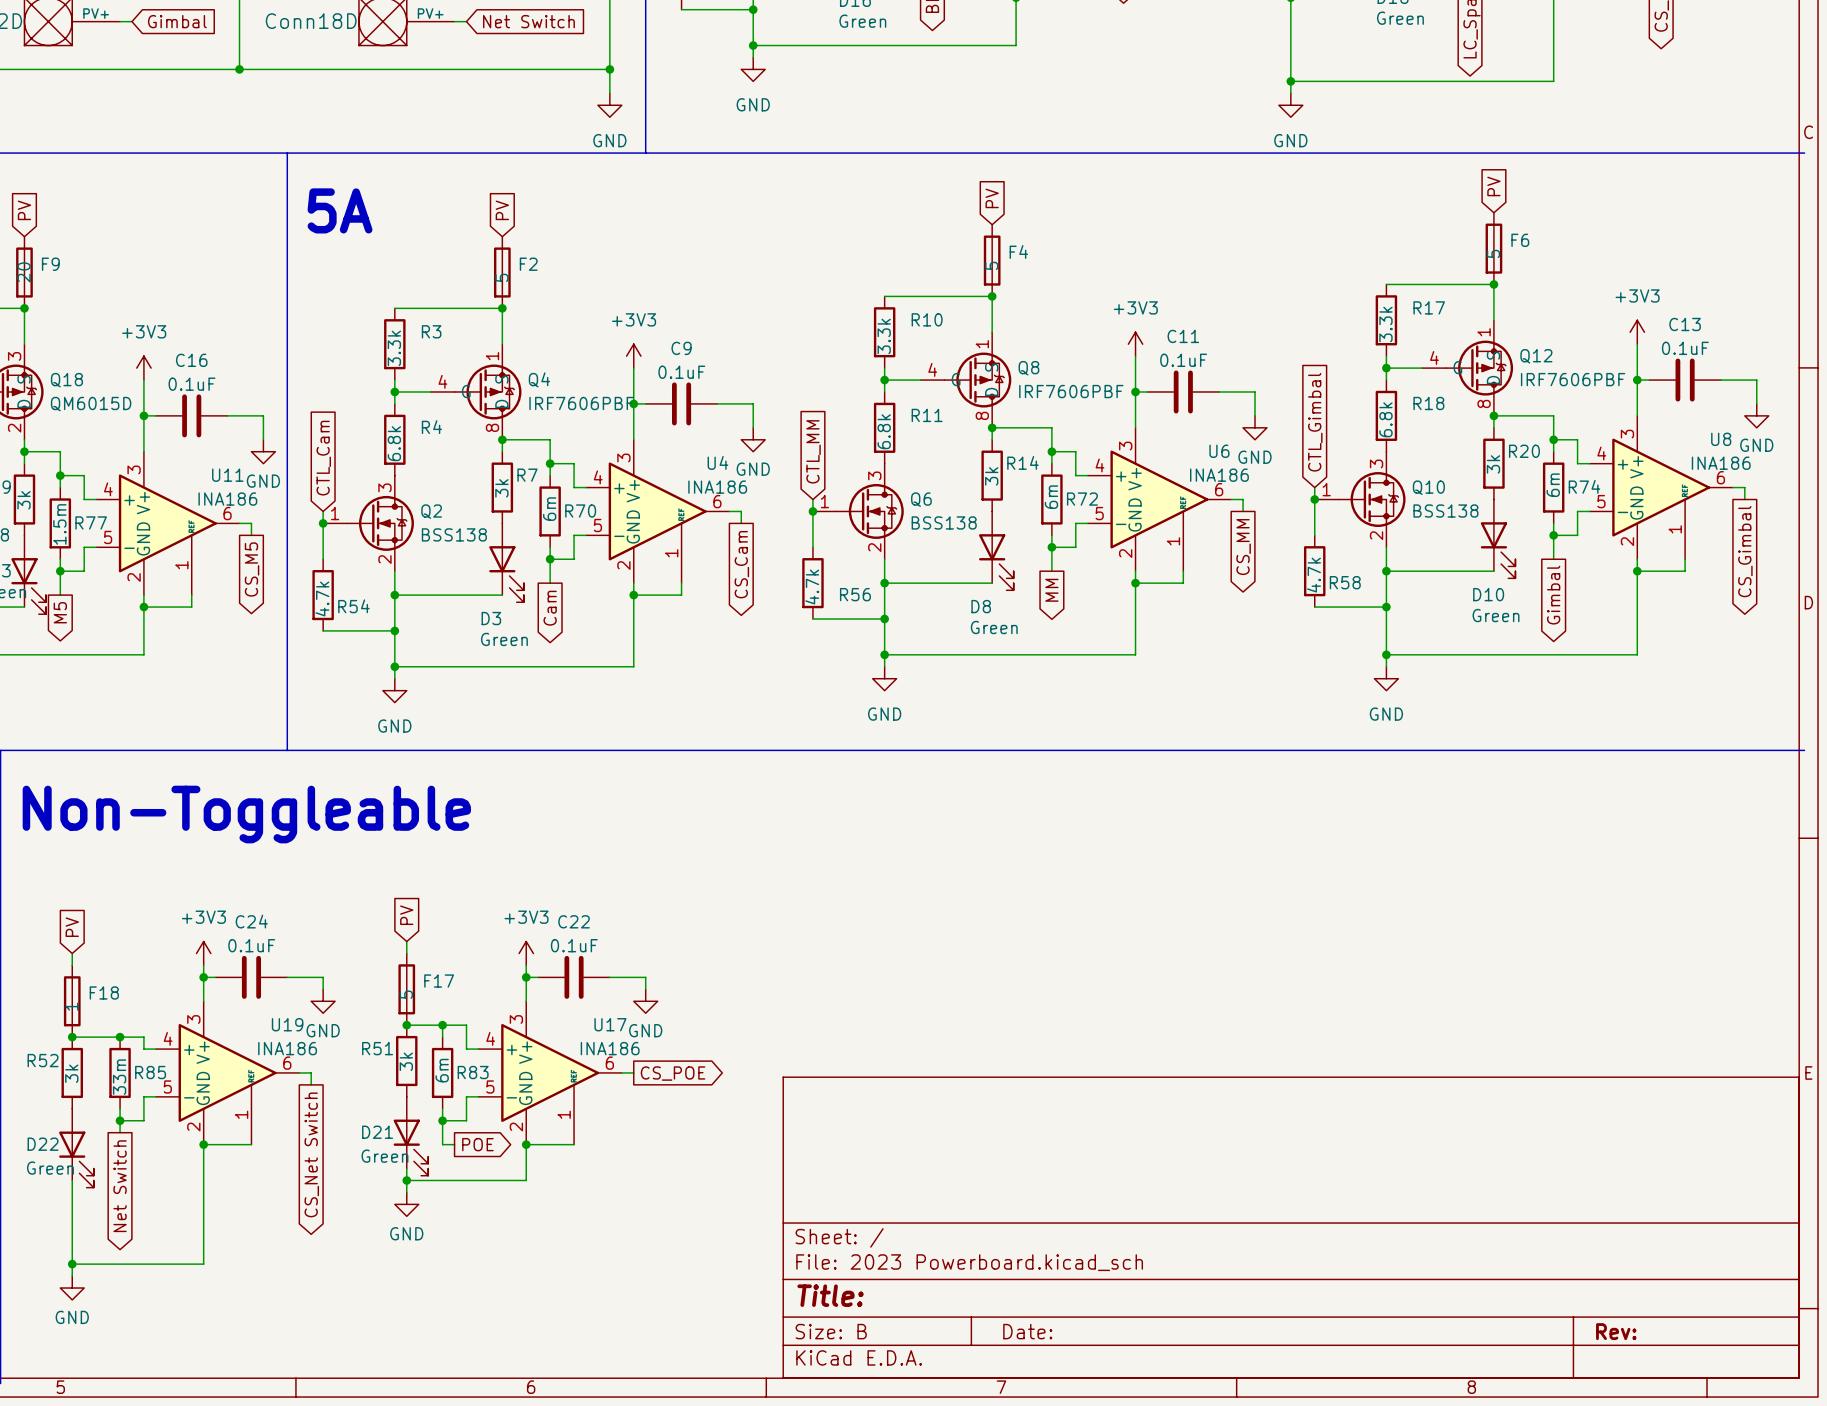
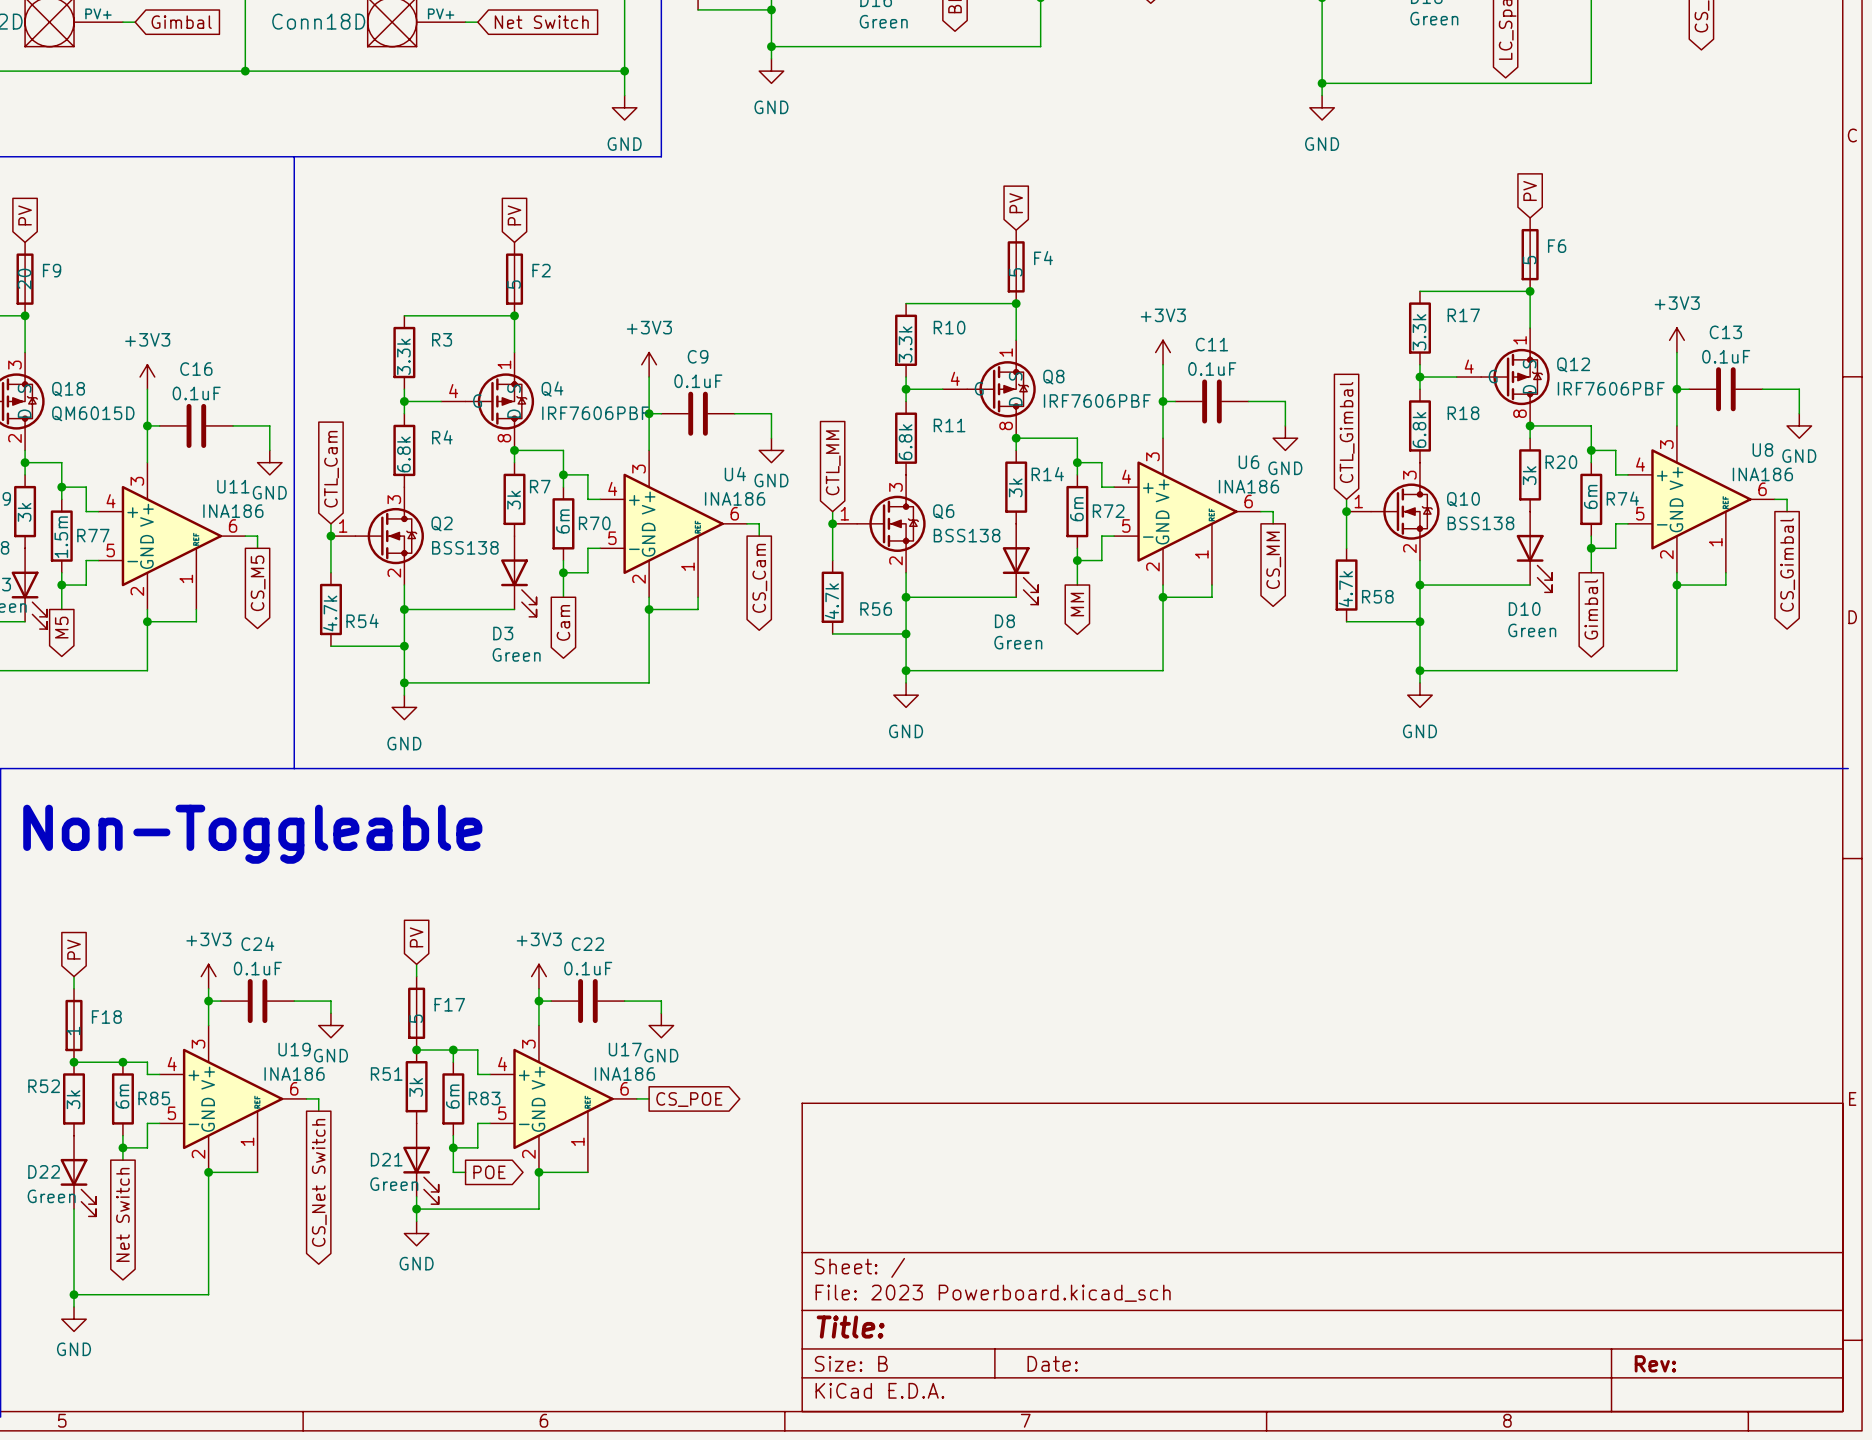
line: (645, 153) (1804, 153) -> none
text: 5A (340, 210) -> none
R85 value: 33m (119, 1077) -> 6m (122, 1096)

